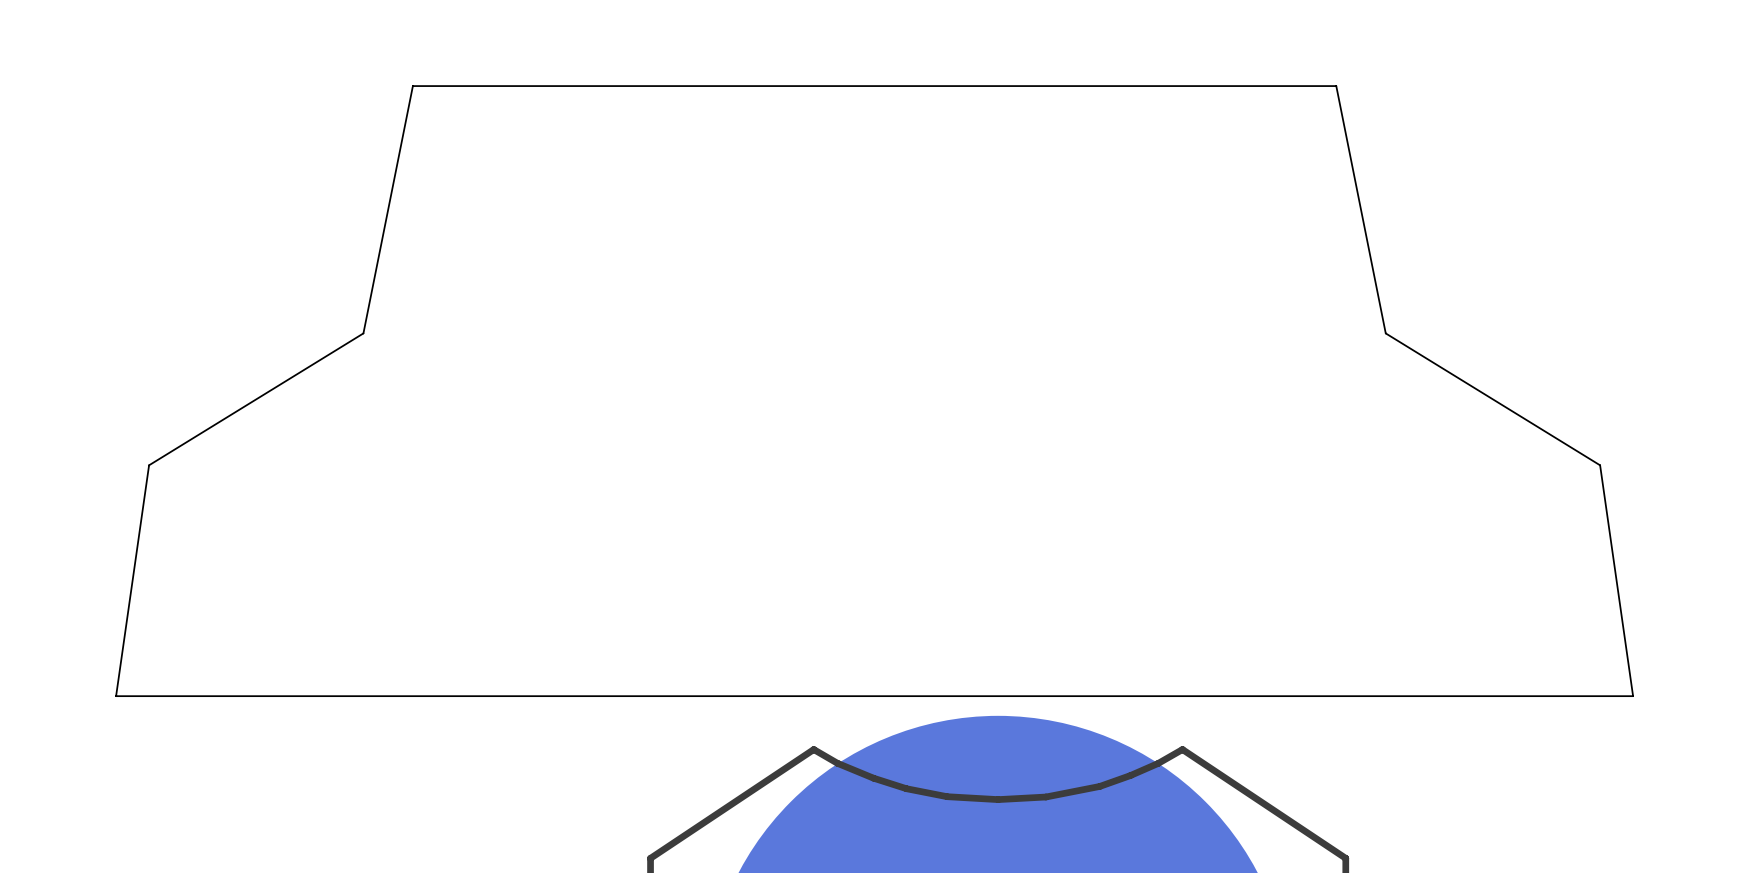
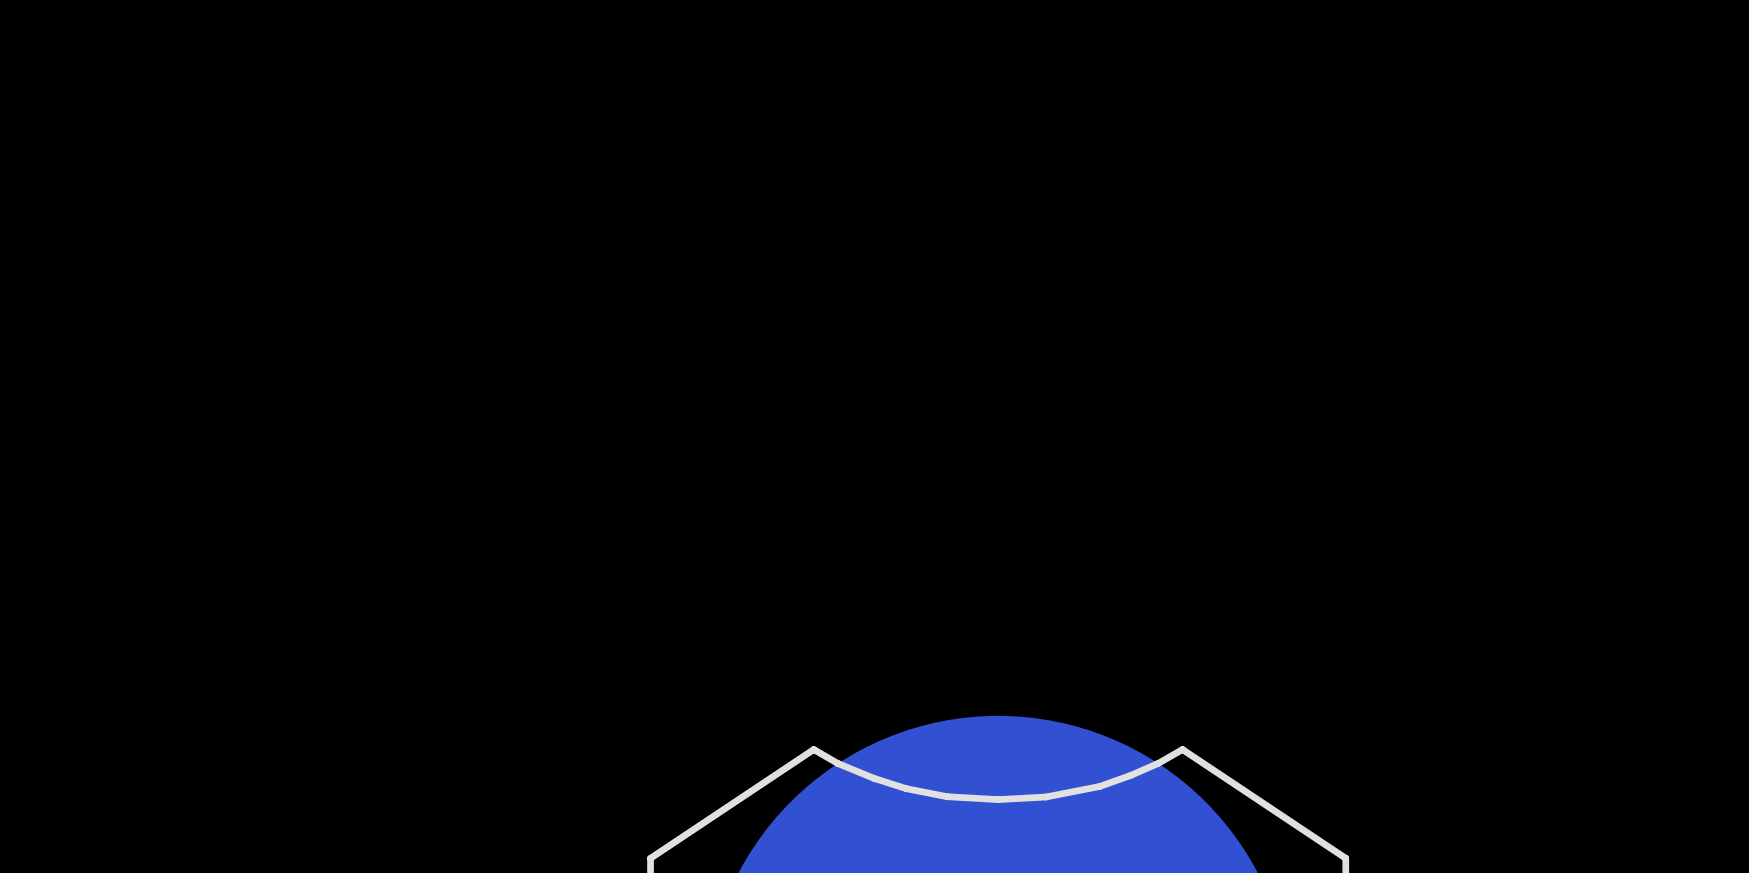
board edge: (1336, 86) (412, 86) (363, 333) (149, 465) (116, 696) (1633, 696) (1600, 465) (1385, 333) (1336, 86) -> none

